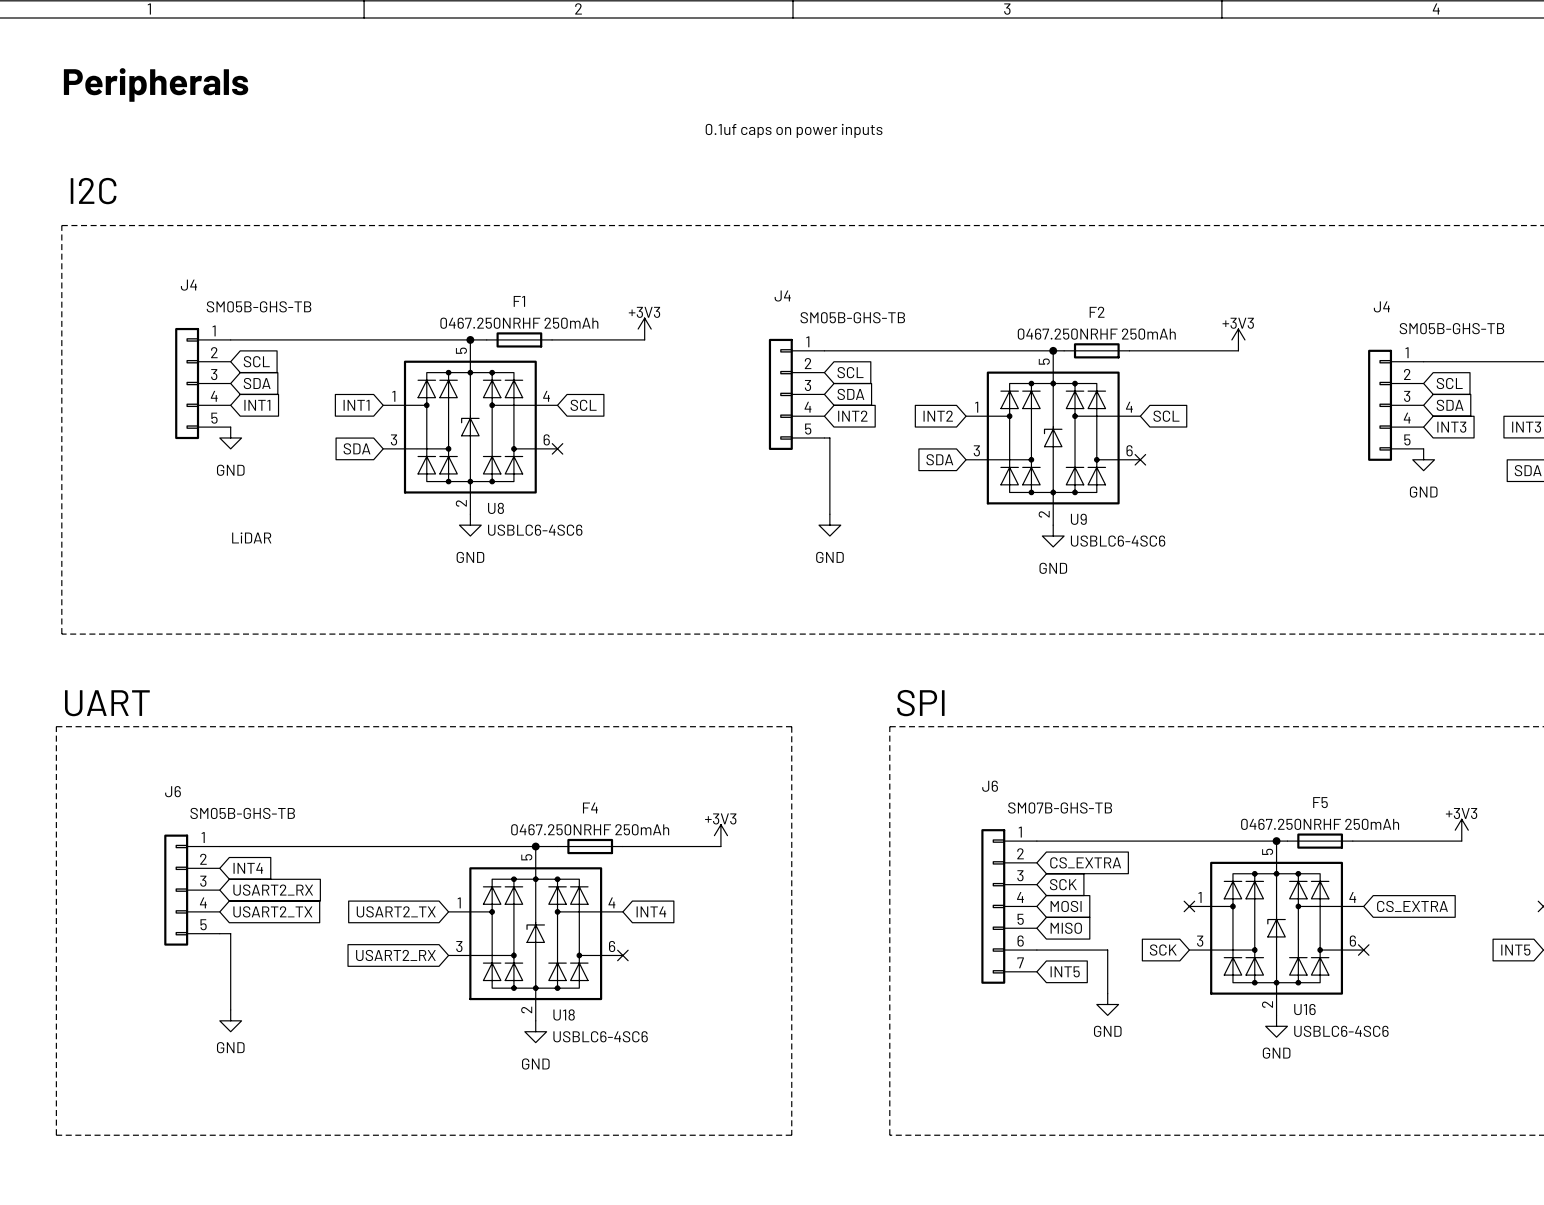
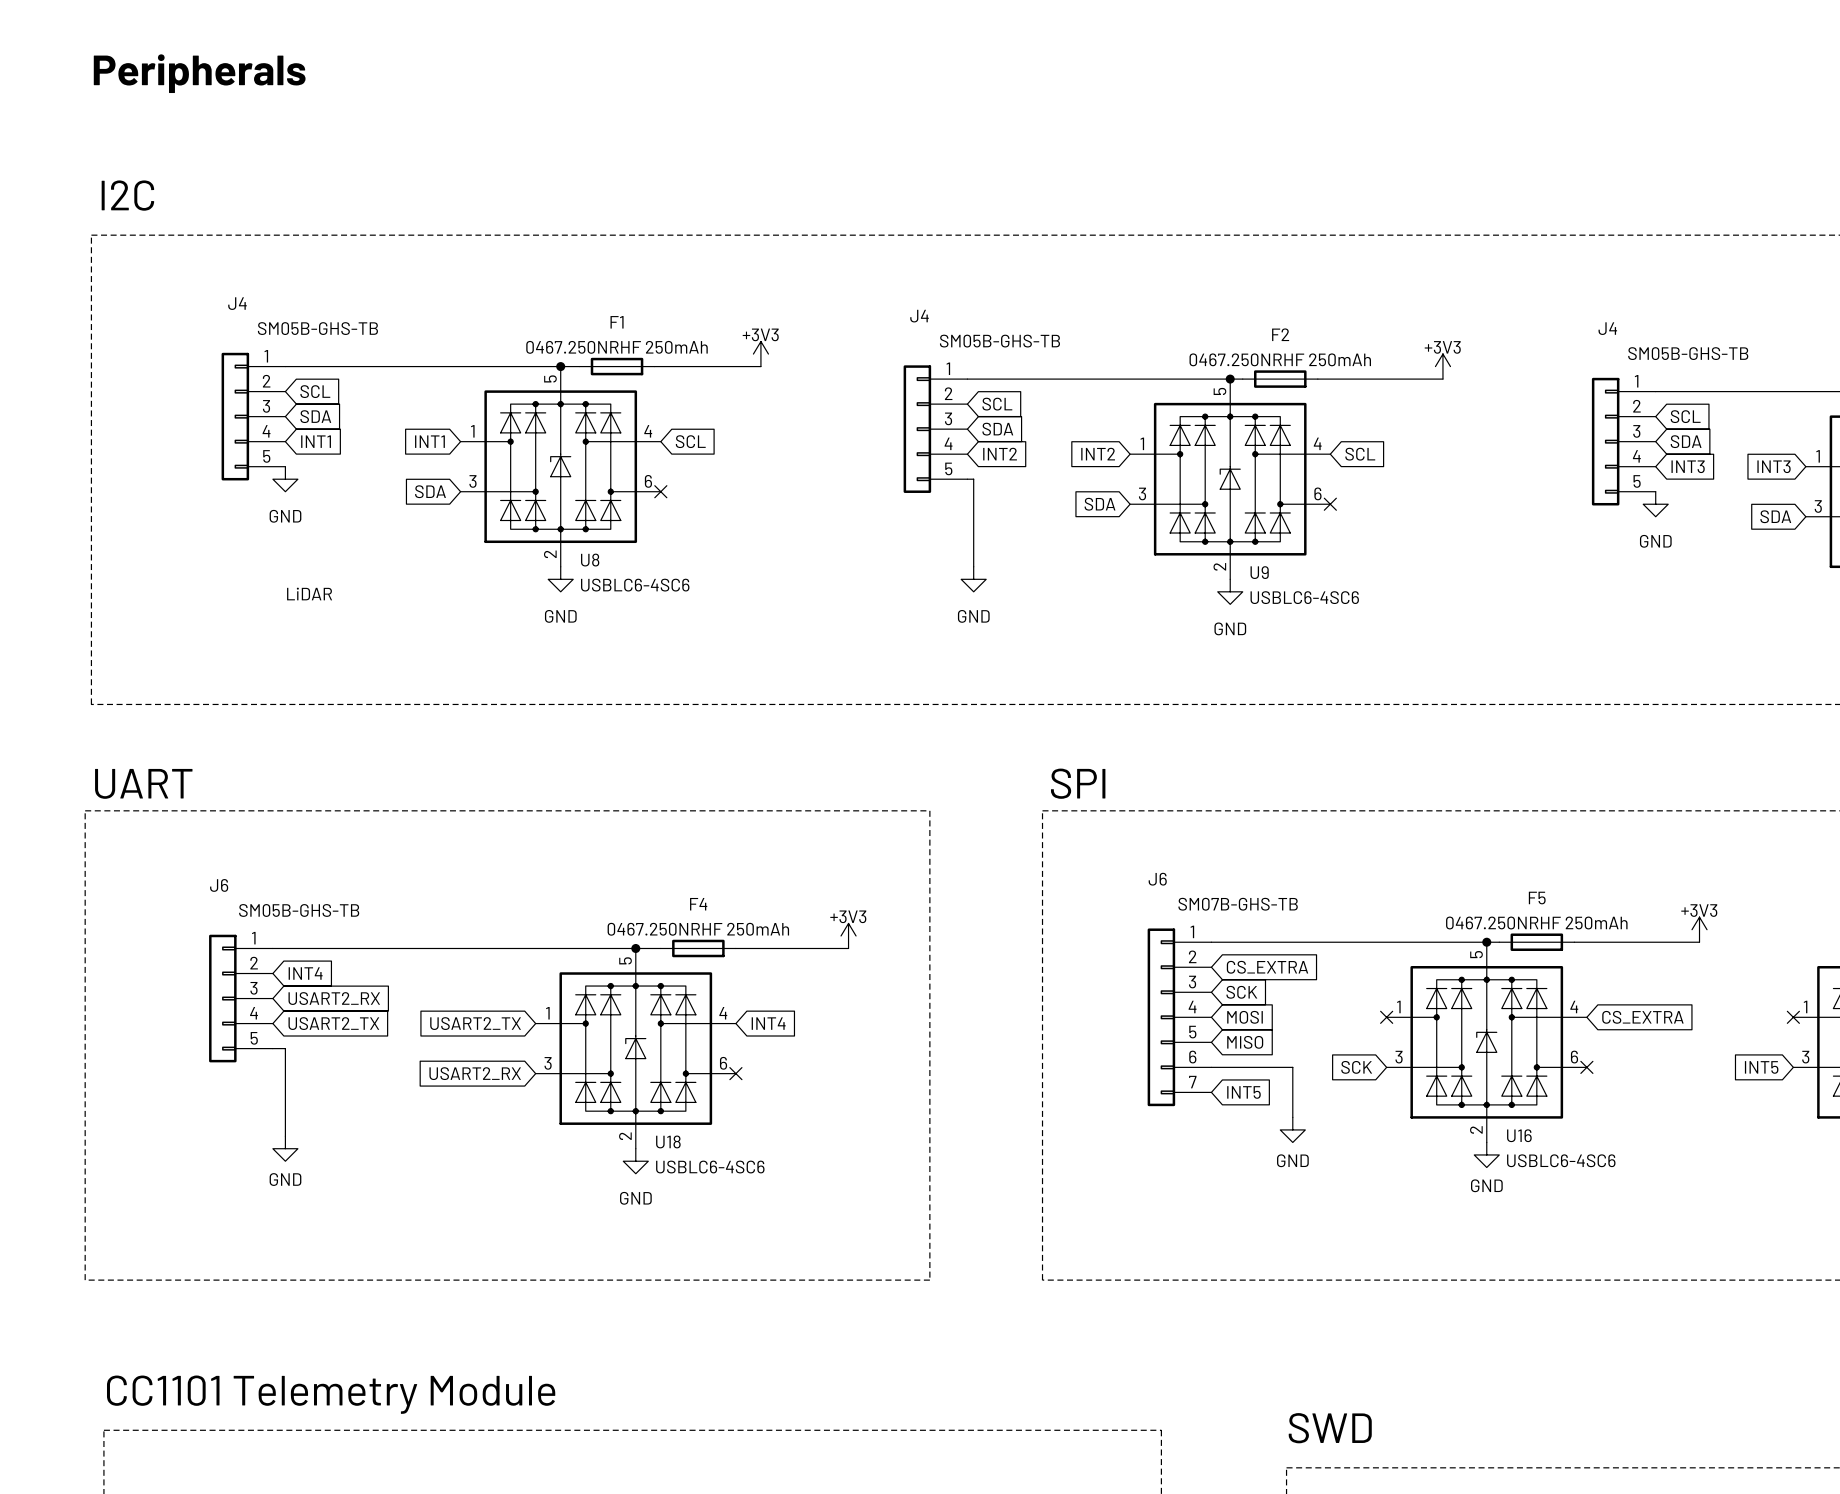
text: 0.1uf caps on power inputs (794, 130) -> none

